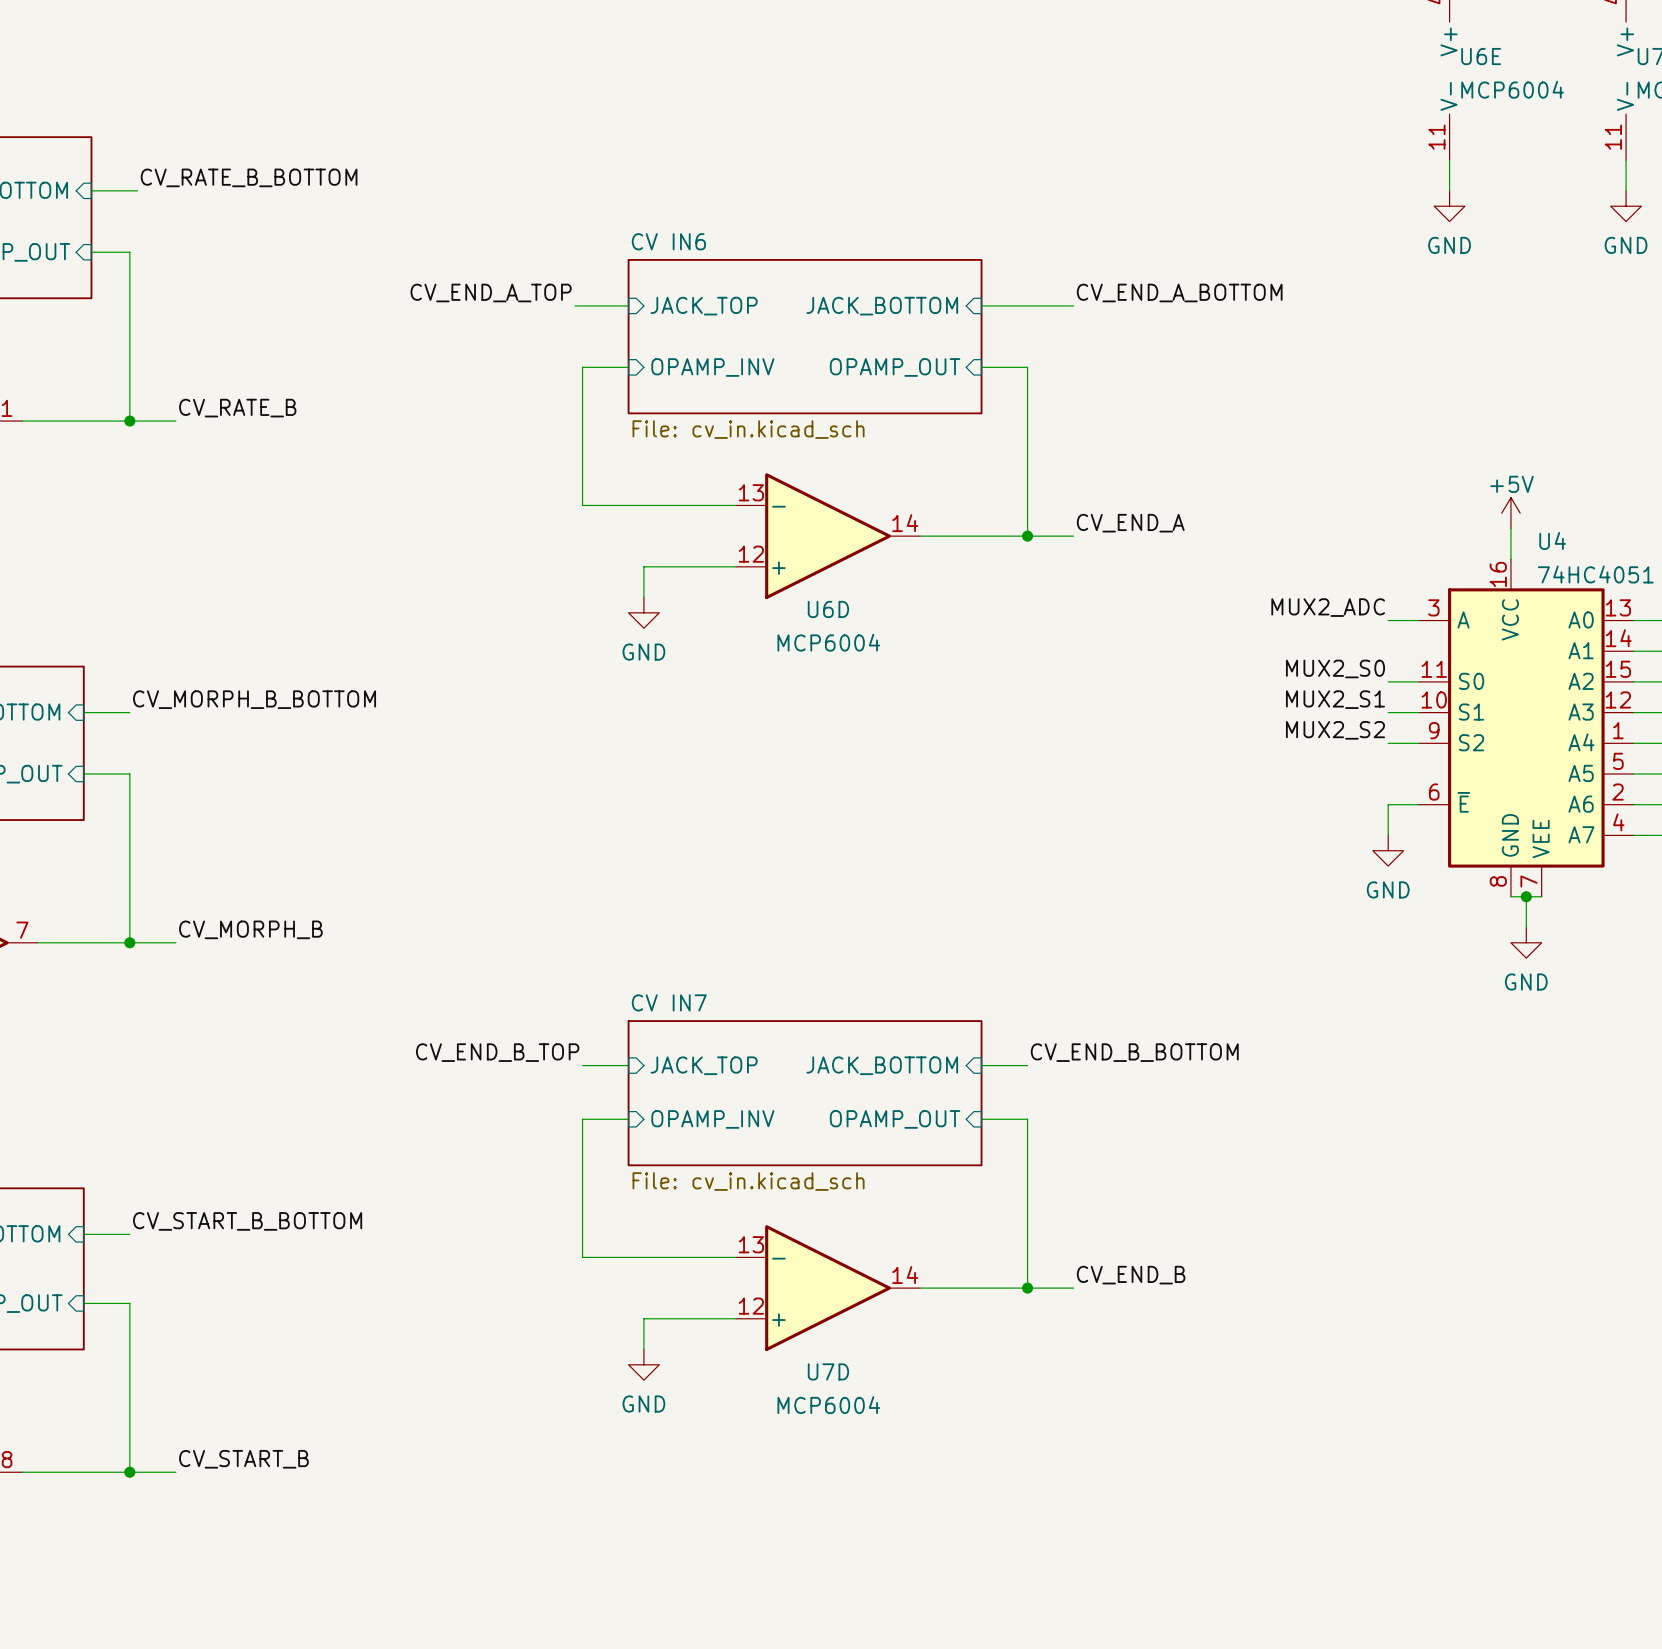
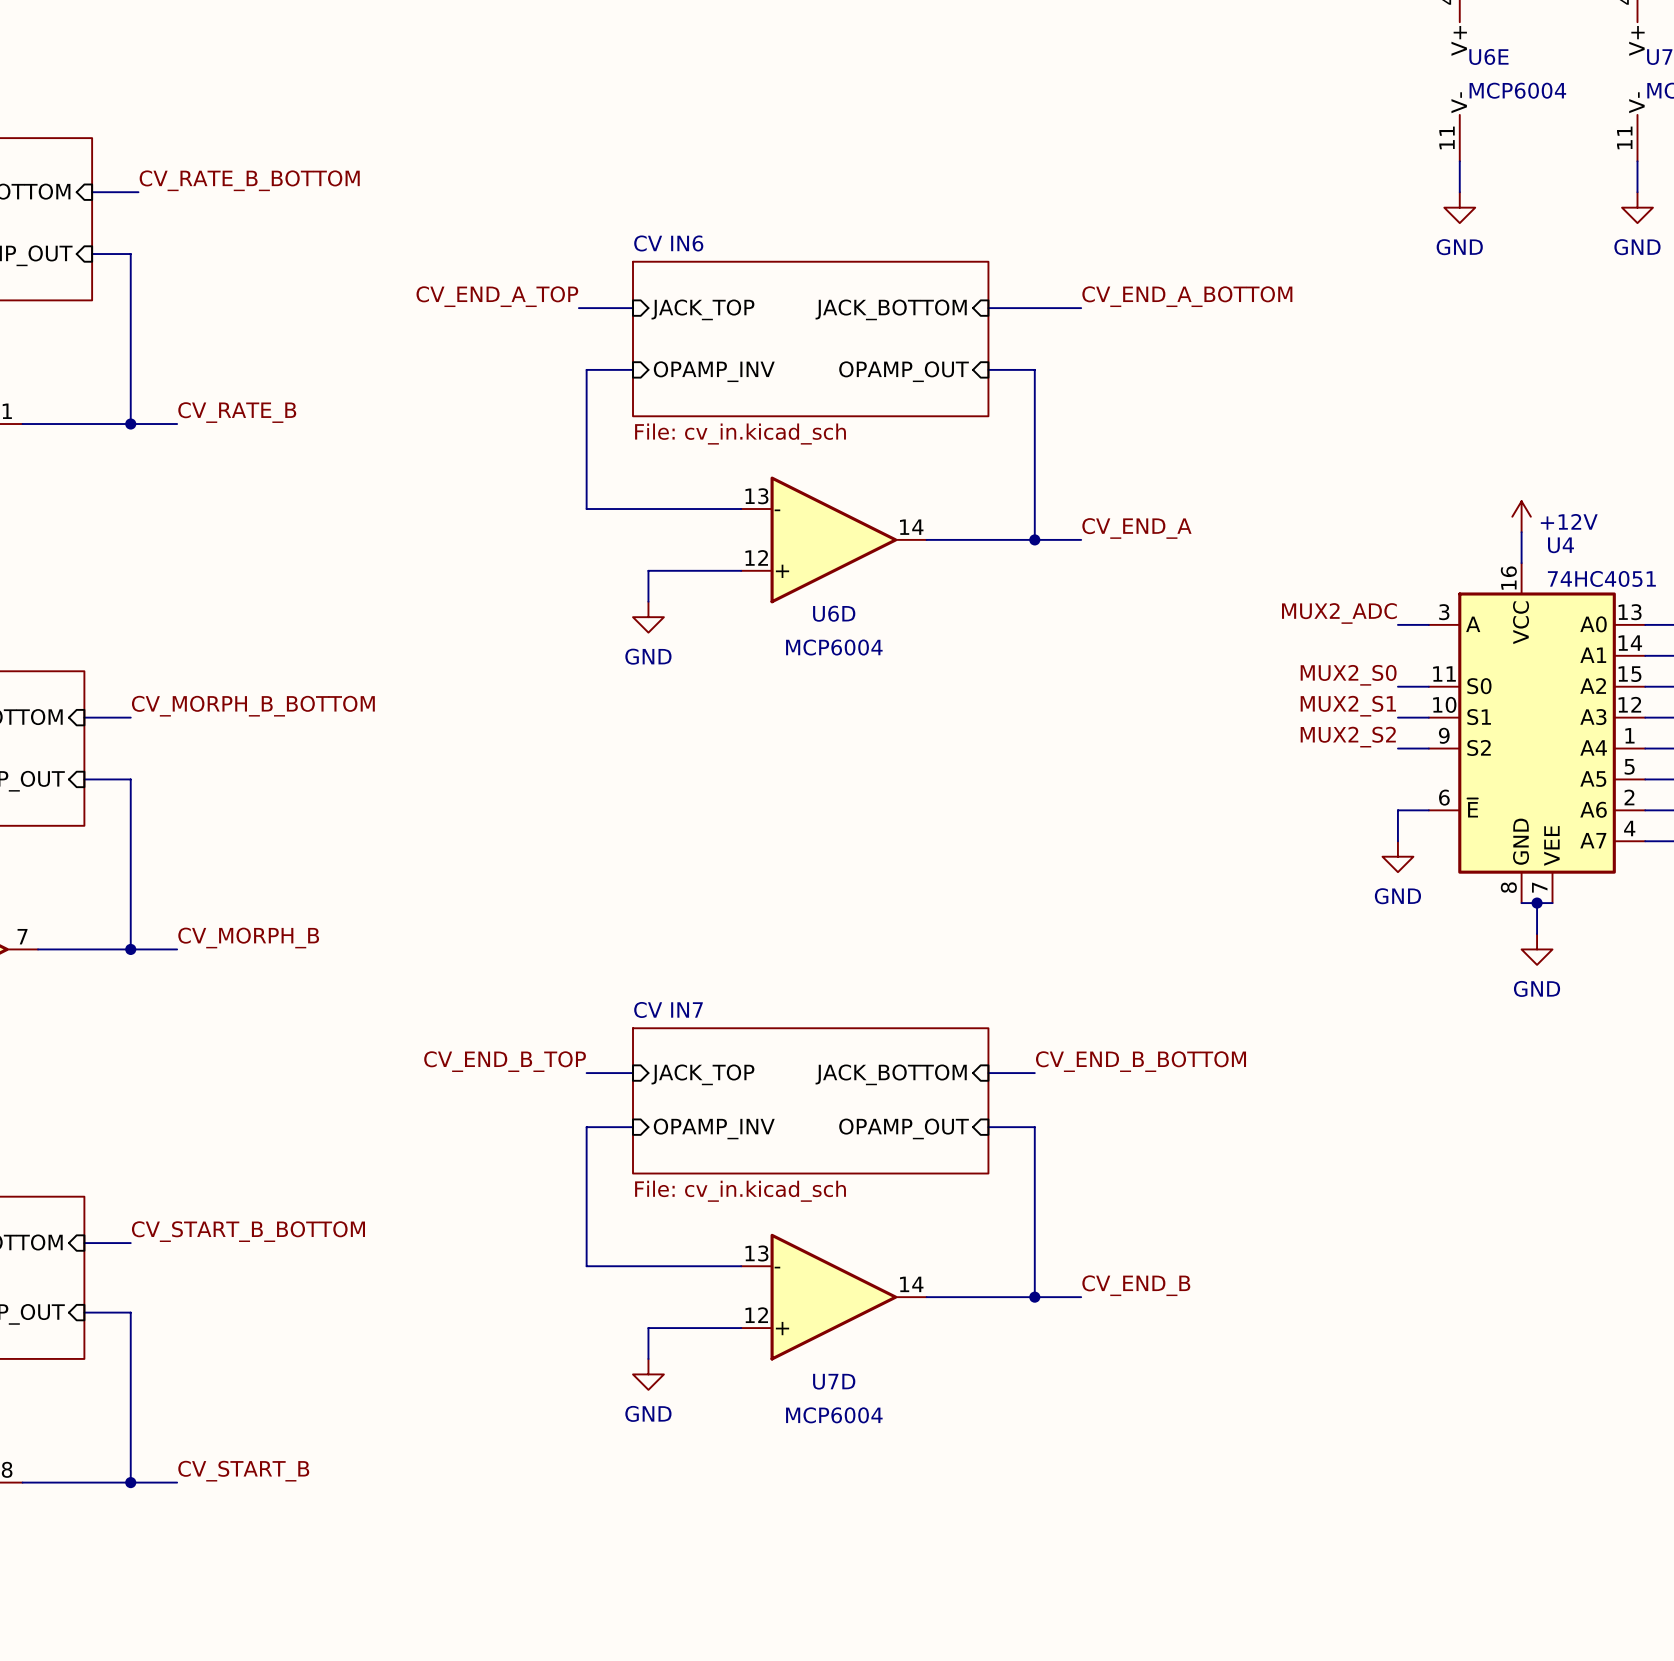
power symbol: +5V (1510, 513) -> +12V (1521, 516)

